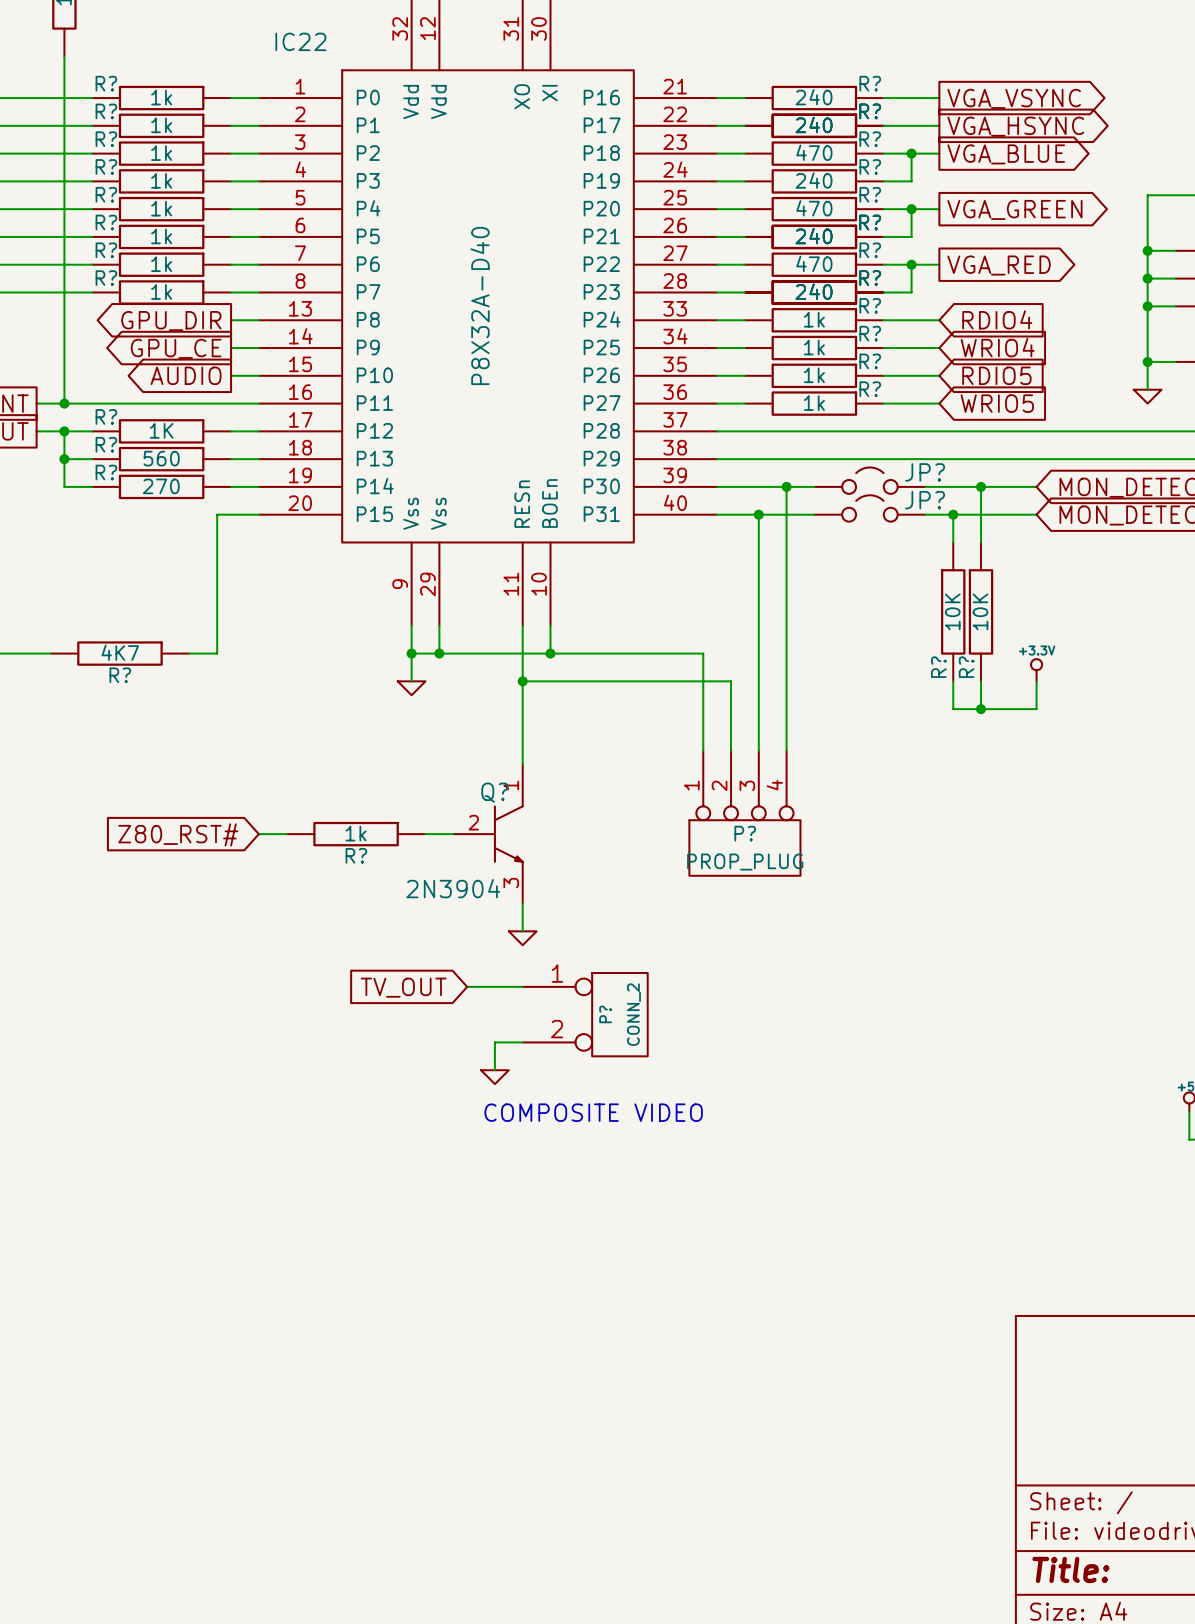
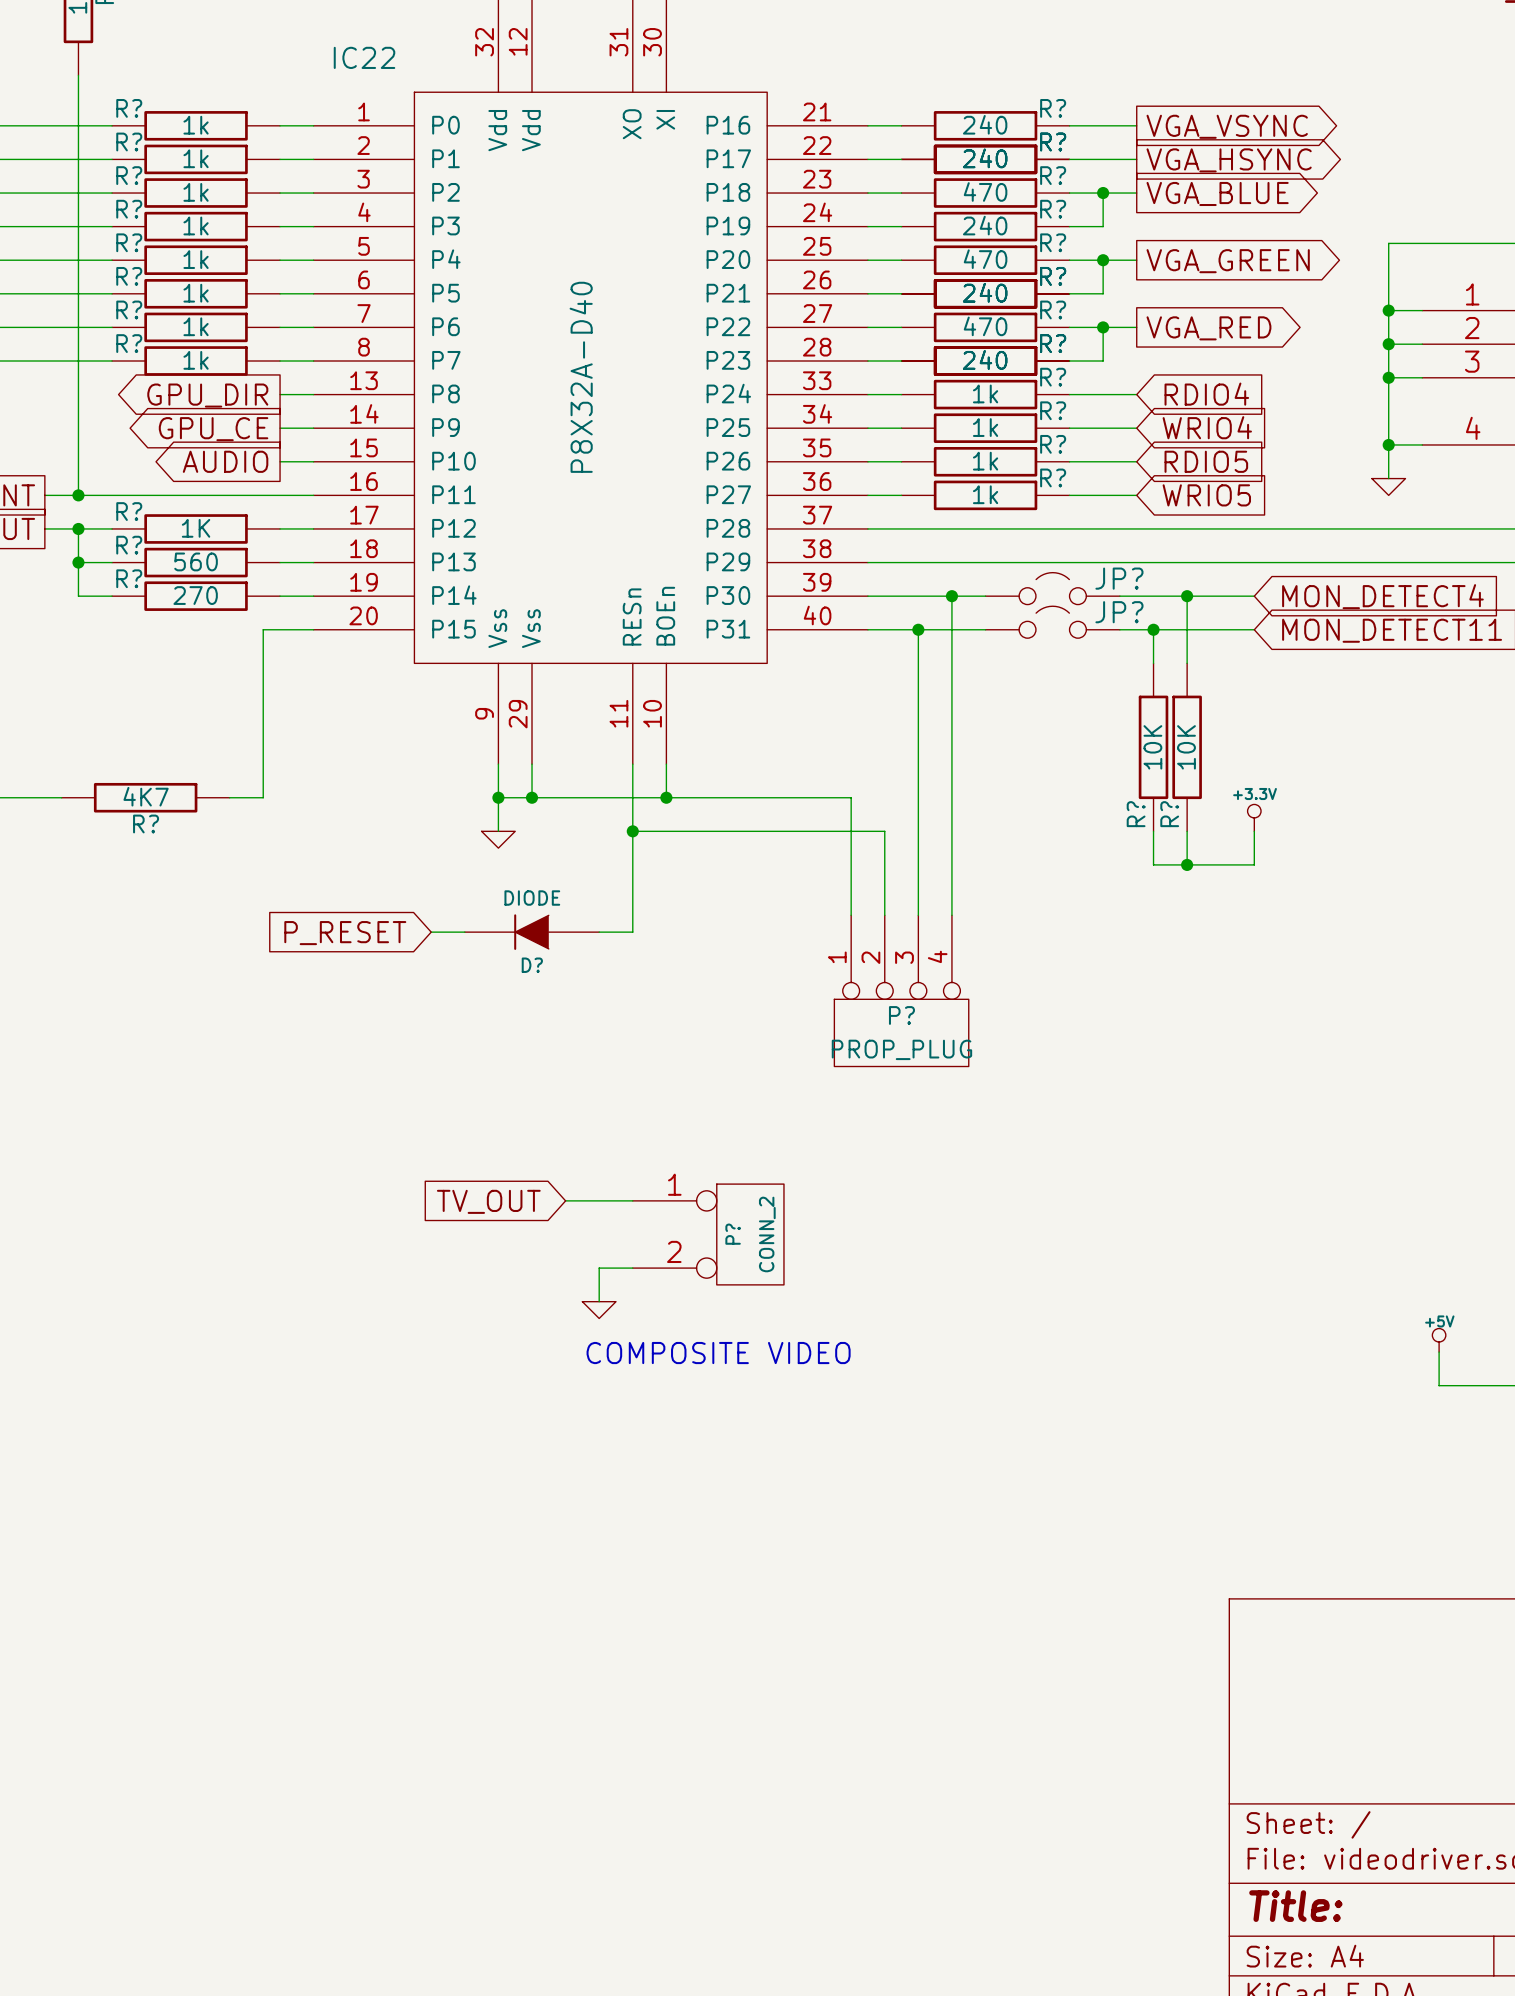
D?: none -> DIODE (532, 932)
global label: none -> P_RESET (345, 933)
global label: Z80_RST# (178, 834) -> none
wire: (258, 834) (286, 834) -> (599, 932) (632, 932)
R?: 1k (356, 834) -> none
wire: (425, 834) (453, 834) -> (431, 932) (464, 932)
Q?: 2N3904 (487, 834) -> none
wire: (522, 903) (522, 931) -> none
power symbol: (522, 938) -> none

